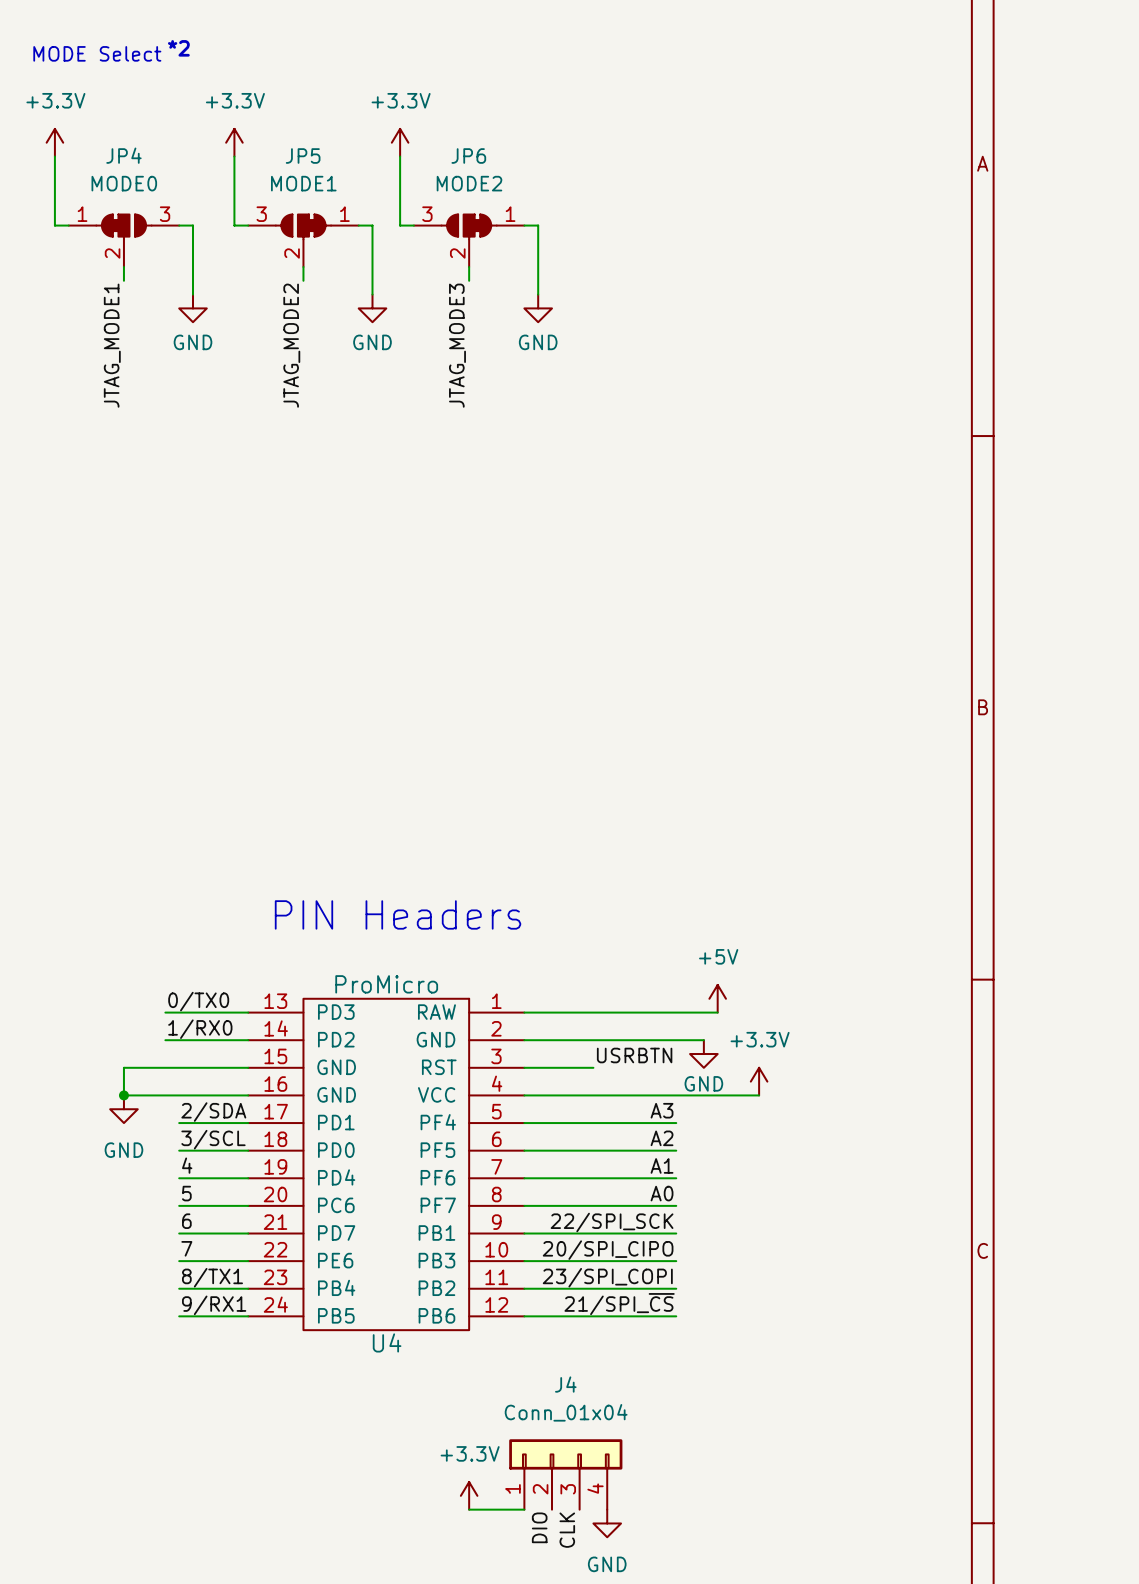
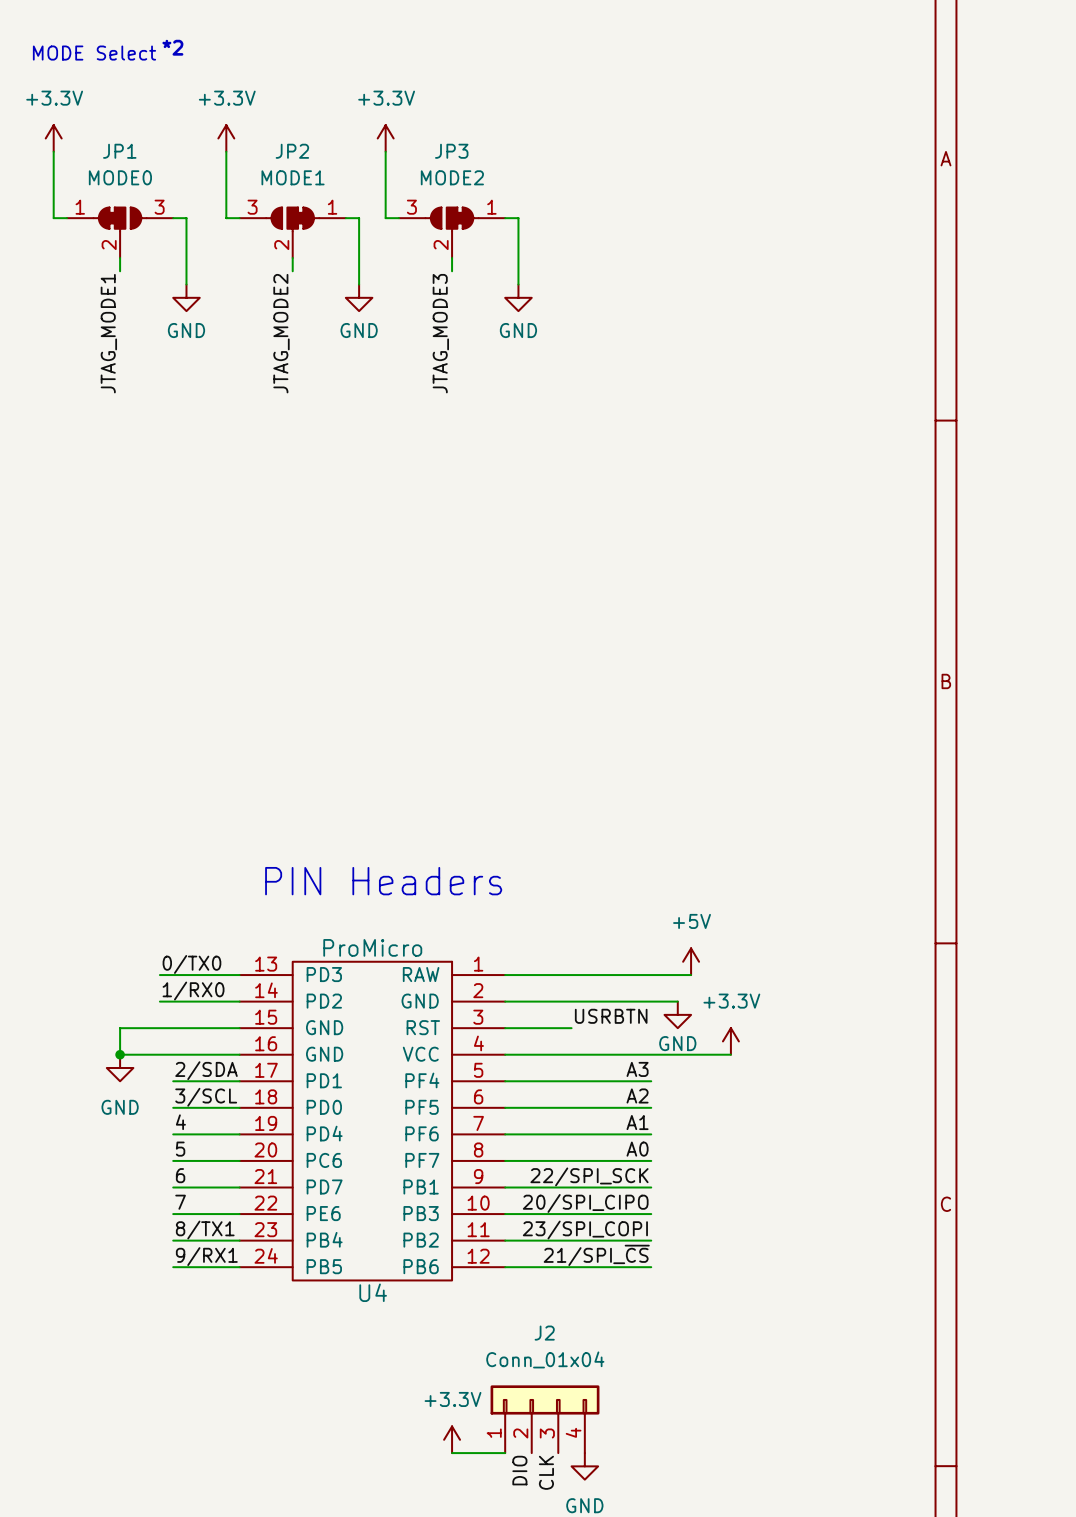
JP4 name: JP4 (123, 155) -> JP1 (119, 151)
JP5 name: JP5 (303, 156) -> JP2 (292, 151)
JP6 name: JP6 (468, 156) -> JP3 (451, 151)
J4 name: J4 (565, 1384) -> J2 (544, 1333)

